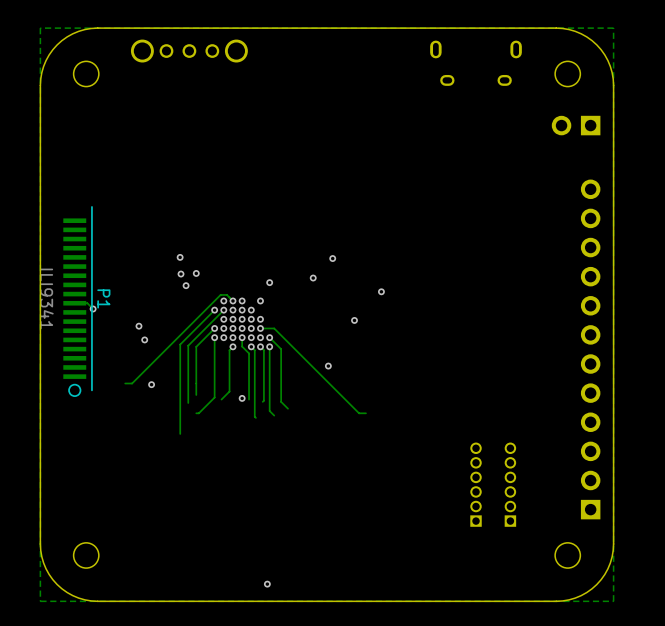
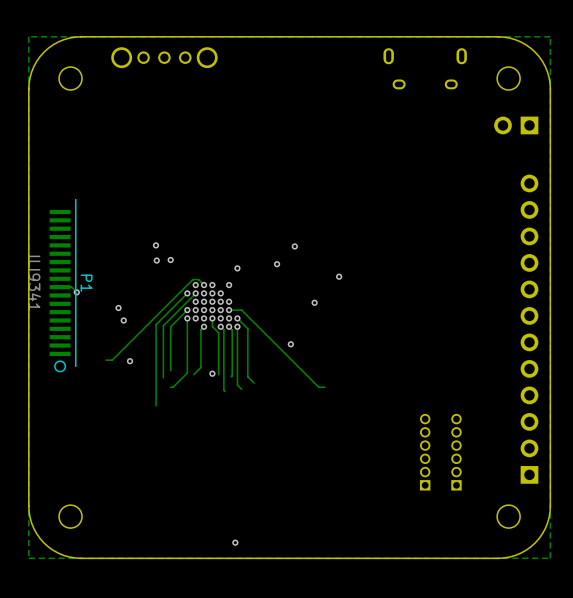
via: (186, 285) -> none

